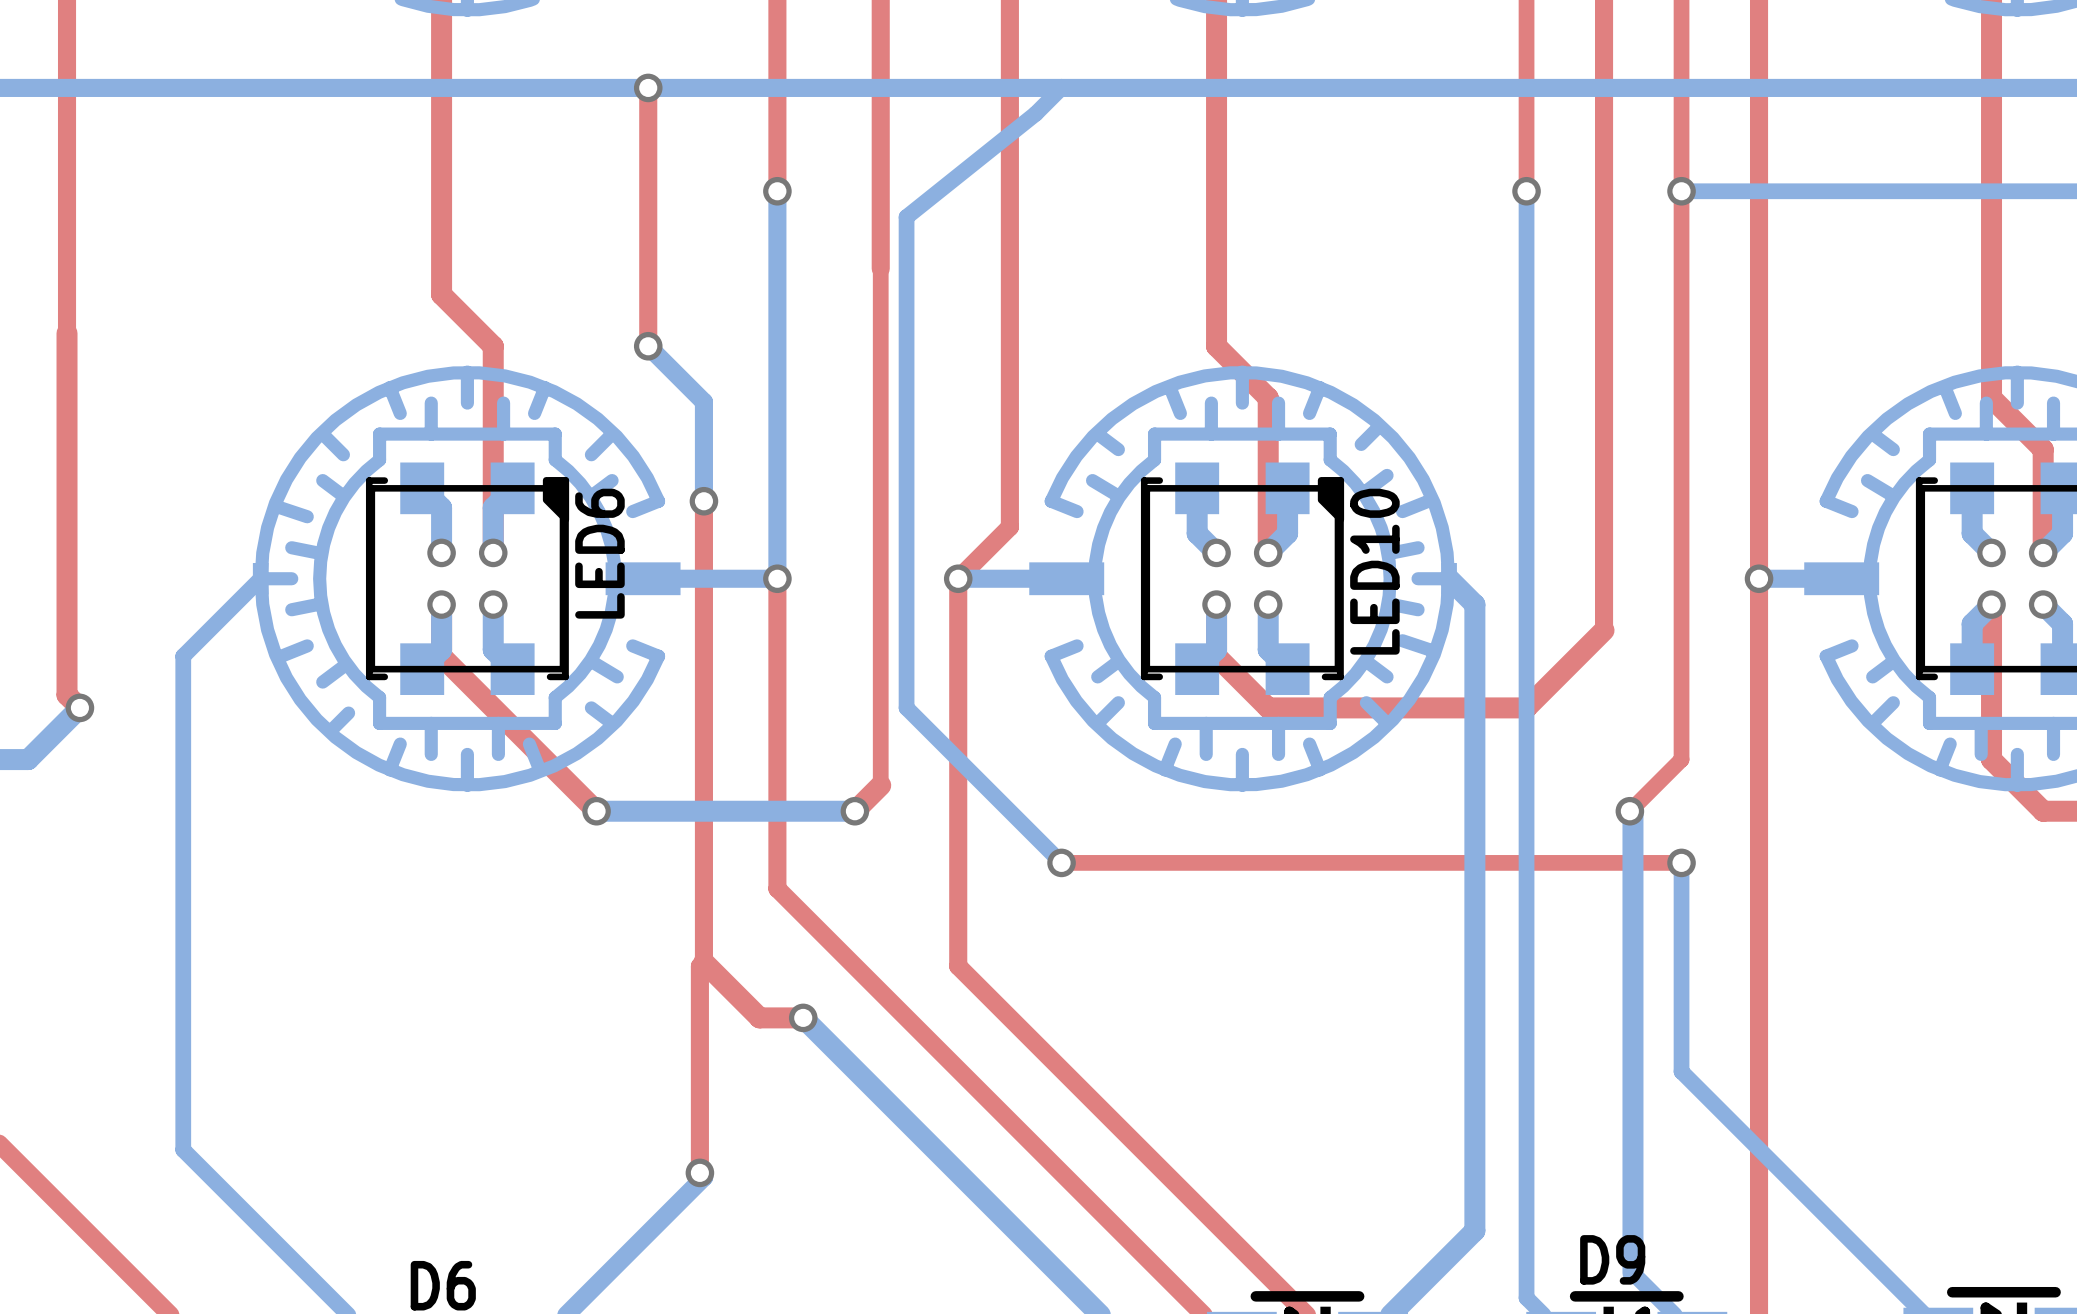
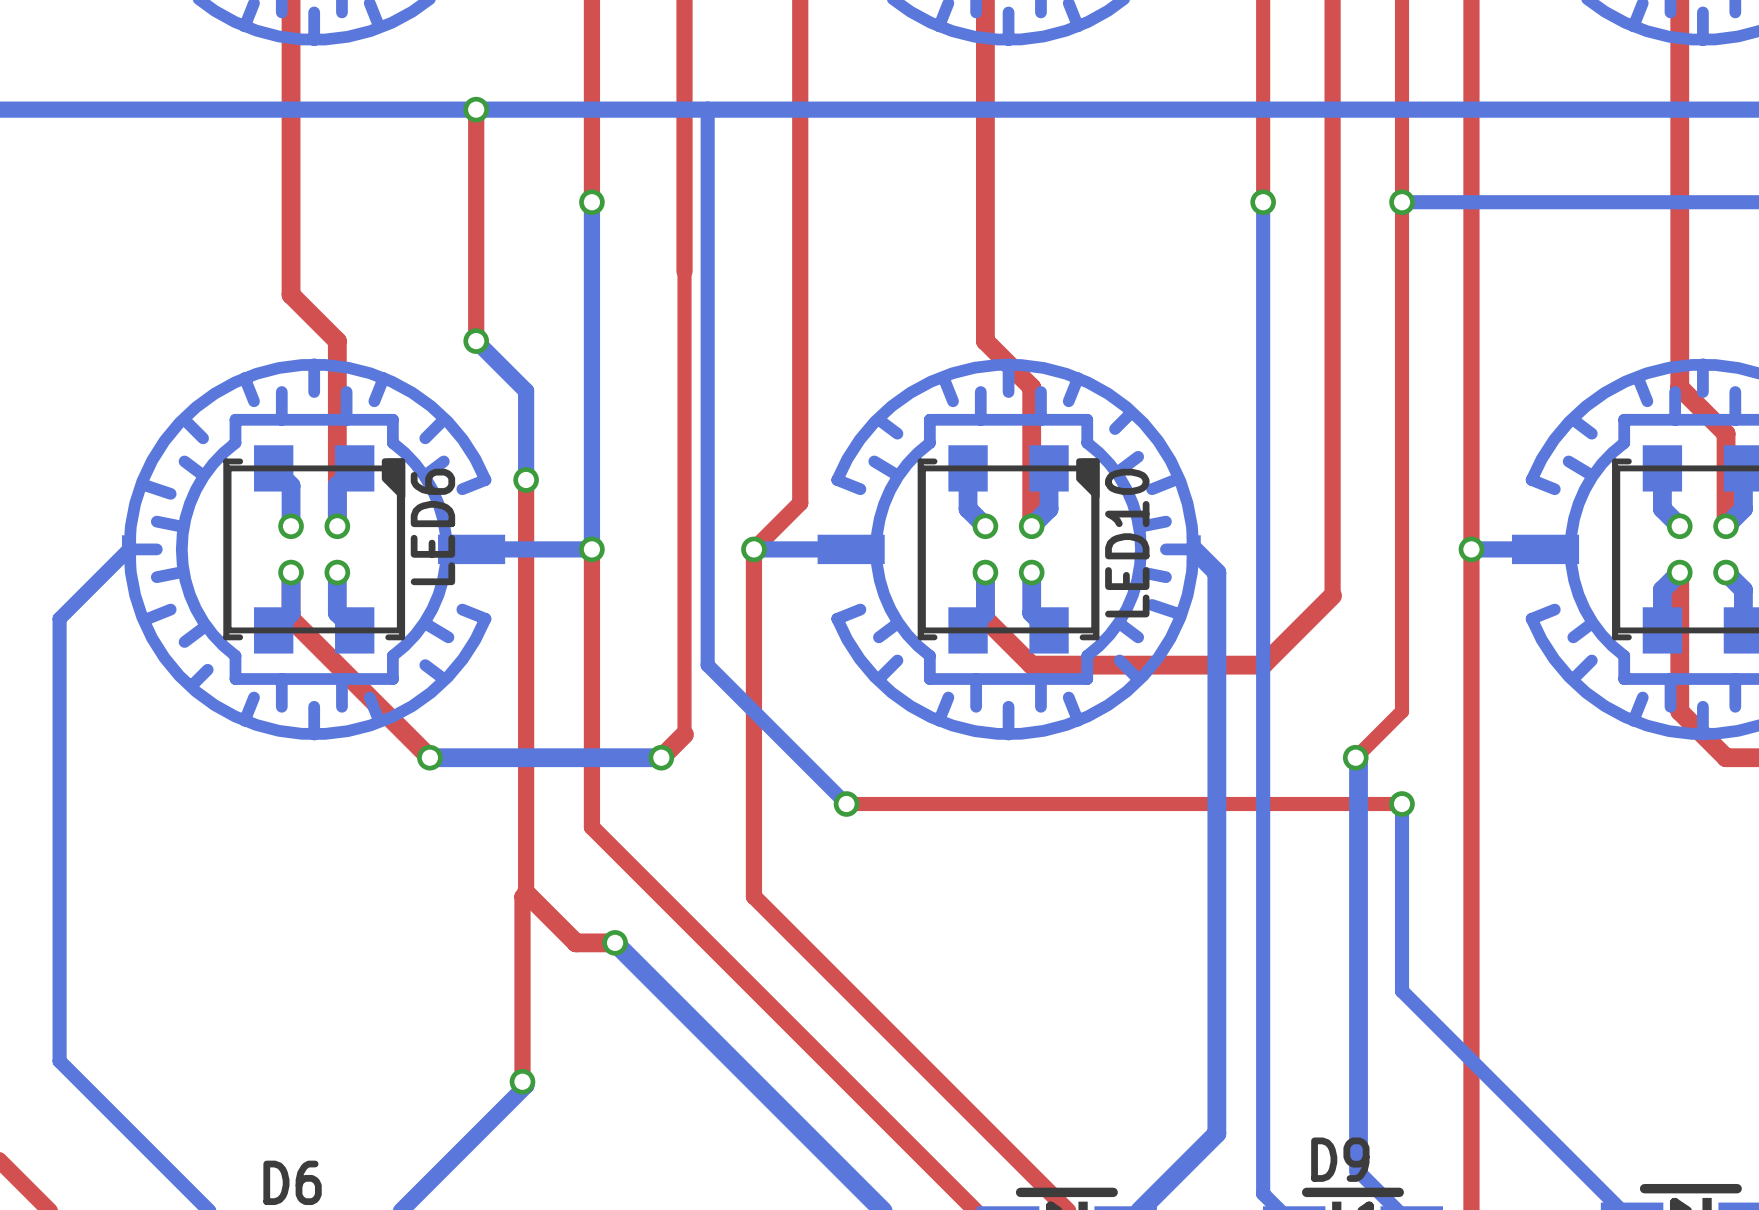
bottom track: (1061, 87) (1035, 113) (906, 217) -> (707, 109) (707, 225)

